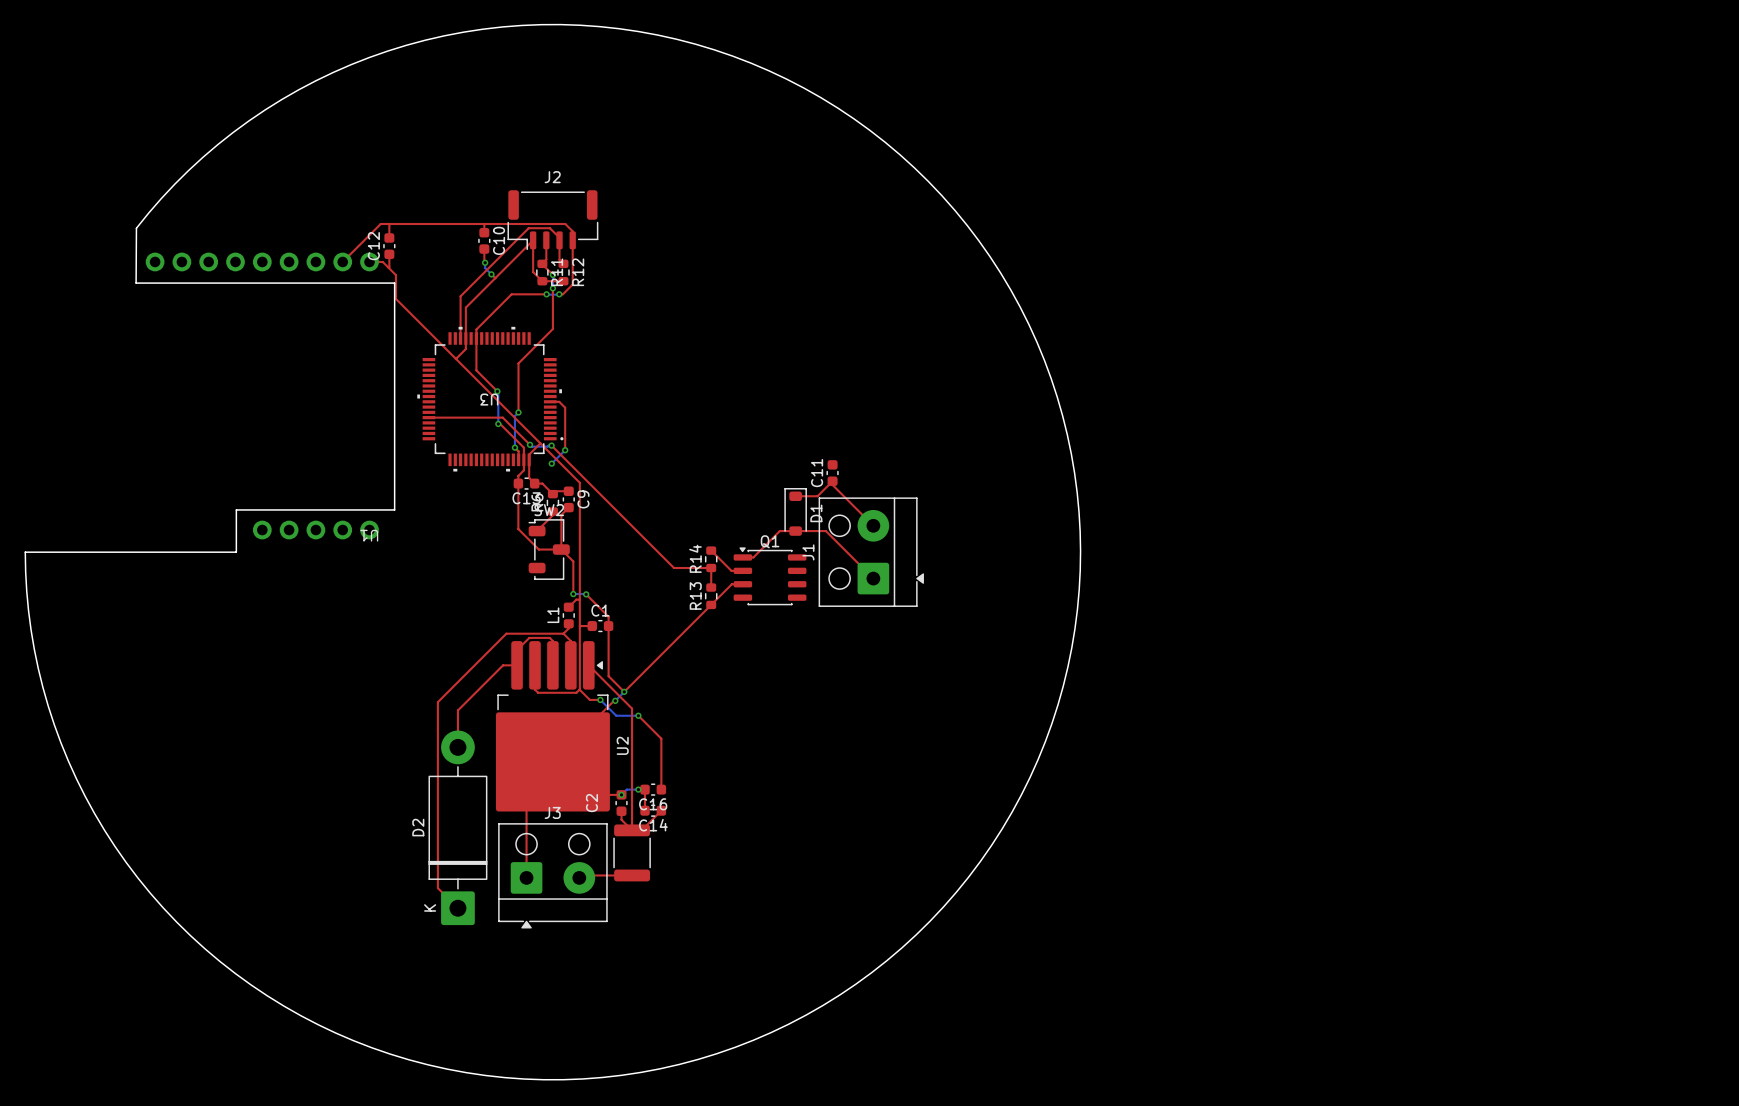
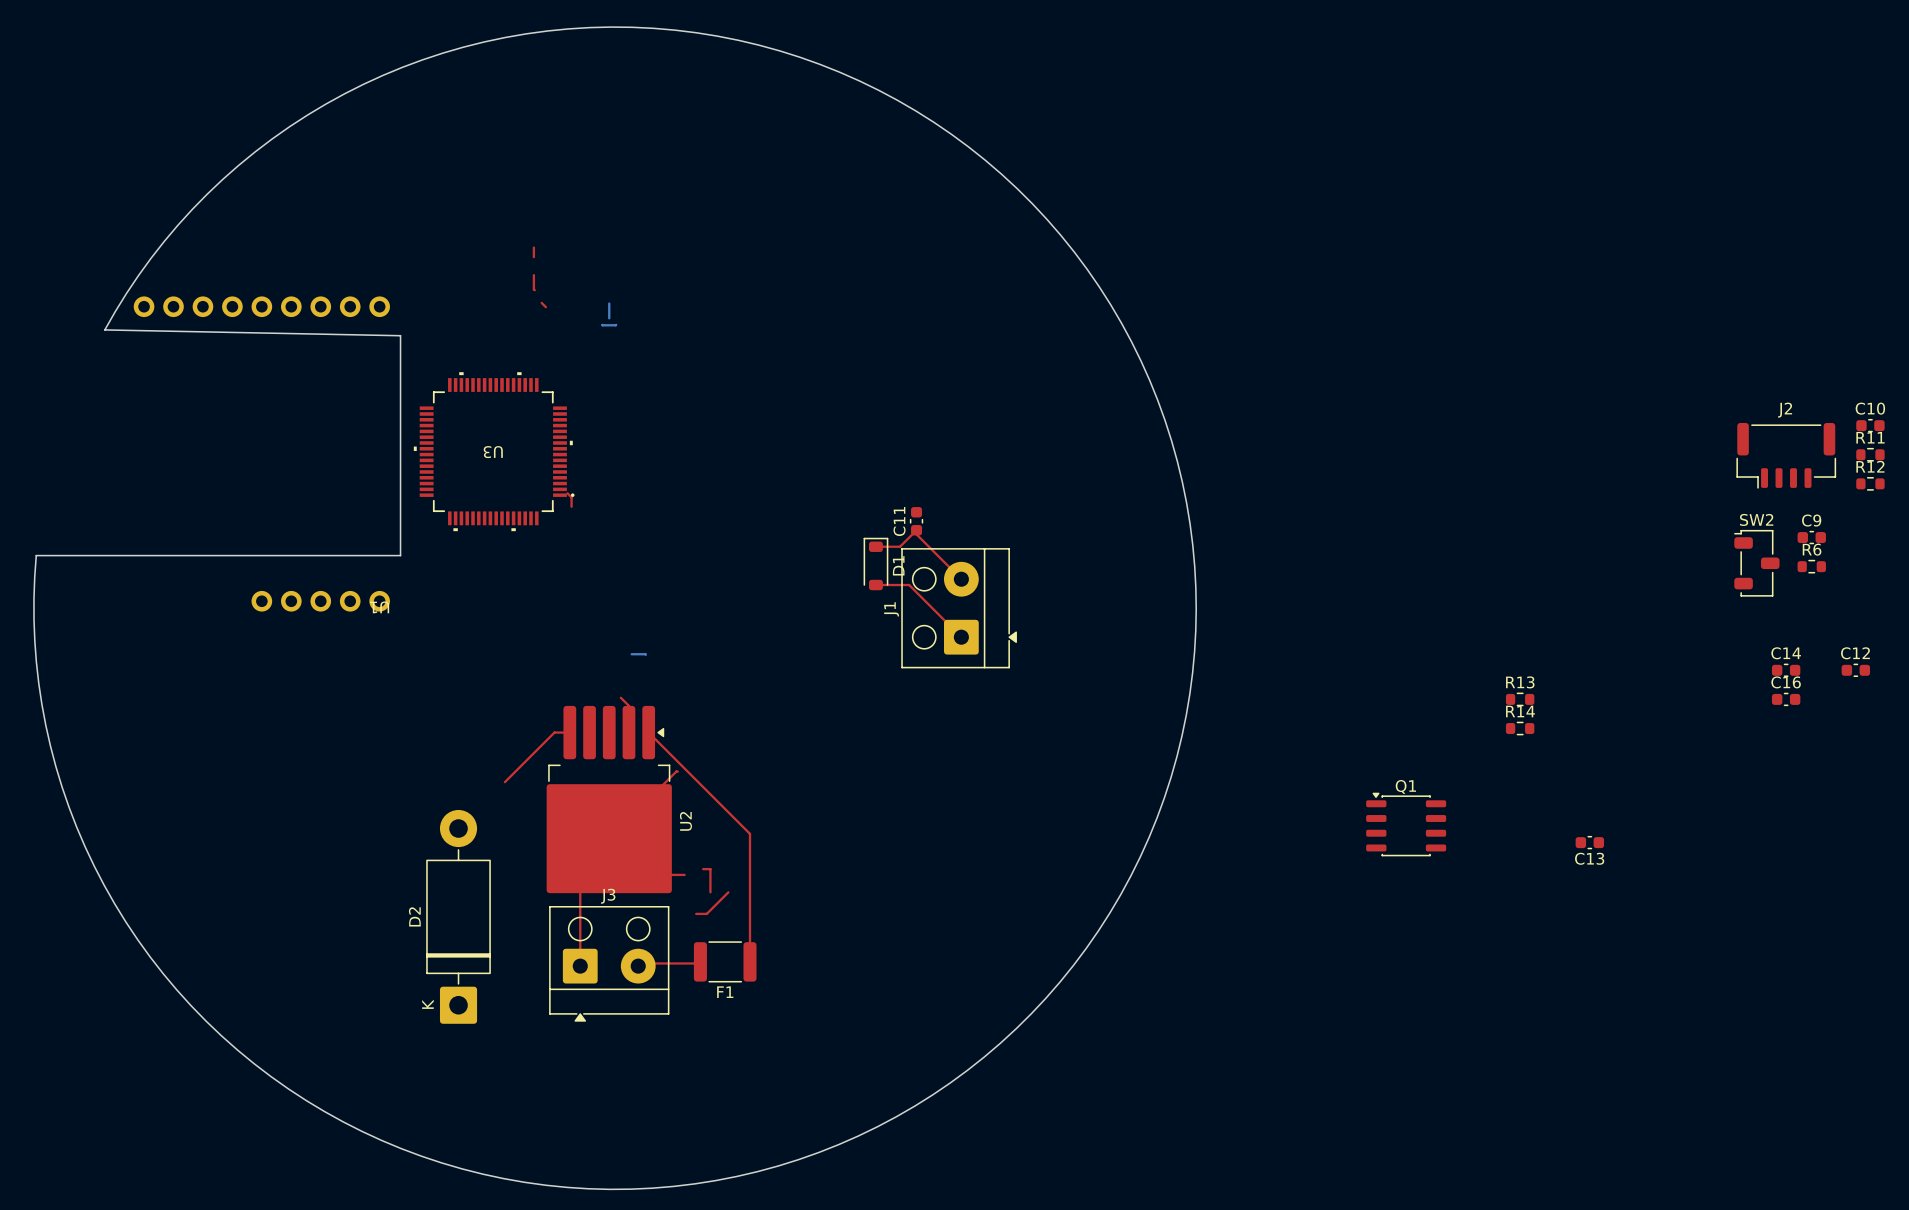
J2 position: (552, 220) -> (1786, 455)
top track: (389, 223) (389, 237) -> none
board edge: (136, 228) (136, 283) (394, 283) (394, 509) (236, 509) (236, 552) (25, 552) (28, 610) (38, 668) (54, 724) (76, 778) (104, 830) (150, 893) (190, 935) (235, 973) (267, 995) (318, 1024) (353, 1040) (409, 1059) (446, 1069) (504, 1077) (563, 1079) (621, 1075) (660, 1068) (716, 1053) (771, 1032) (806, 1015) (855, 984) (886, 960) (930, 921) (968, 877) (1002, 829) (1021, 795) (1037, 759) (1057, 704) (1071, 647) (1079, 589) (1080, 531) (1077, 492) (1067, 434) (1051, 378) (1028, 324) (1010, 289) (978, 240) (954, 210) (928, 181) (884, 142) (837, 107) (786, 79) (732, 56) (695, 44) (638, 31) (599, 26) (541, 24) (502, 26) (444, 35) (406, 45) (351, 64) (298, 89) (265, 109) (217, 144) (174, 184) (136, 228) -> (104, 329) (138, 275) (164, 241) (207, 194) (255, 151) (307, 115) (363, 84) (402, 67) (463, 47) (526, 33) (568, 28) (632, 27) (696, 32) (759, 45) (799, 57) (859, 80) (897, 100) (951, 134) (985, 160) (1032, 203) (1074, 252) (1110, 304) (1141, 361) (1165, 420) (1177, 461) (1190, 523) (1194, 566) (1196, 608) (1192, 672) (1182, 735) (1164, 797) (1140, 856) (1120, 894) (1086, 948) (1045, 998) (1000, 1043) (967, 1070) (914, 1106) (858, 1136) (798, 1159) (757, 1171) (694, 1183) (652, 1188) (609, 1189) (545, 1185) (482, 1174) (441, 1162) (381, 1140) (324, 1111) (271, 1076) (237, 1050) (206, 1021) (177, 990) (150, 956) (125, 921) (104, 885) (85, 846) (69, 807) (55, 766) (45, 725) (38, 683) (34, 640) (33, 598) (36, 555) (400, 555) (400, 335) (104, 329)
C10 rotation: 0° (484, 240) -> 90° clockwise (1870, 425)
C10 position: (484, 240) -> (1870, 425)
C10 name position: C10 (499, 240) -> C10 (1870, 408)
top track: (546, 240) (546, 259) (542, 264) (552, 274) -> none
C12 rotation: 0° (389, 246) -> 90° clockwise (1855, 670)
C12 position: (389, 246) -> (1855, 670)
top track: (389, 254) (388, 267) -> none
top track: (342, 261) (380, 223) (565, 223) (572, 231) (572, 284) (562, 294) (559, 294) -> none
top track: (369, 261) (382, 261) (395, 275) (395, 298) (579, 482) (579, 689) (576, 692) (538, 692) (534, 689) (534, 665) -> none
bottom track: (485, 262) (485, 268) (491, 274) -> none
via: (485, 262) -> none
top track: (563, 263) (559, 259) (559, 237) (549, 228) (528, 228) (460, 296) (460, 338) -> none
R11 rotation: 0° (542, 272) -> 90° clockwise (1870, 454)
R11 position: (542, 272) -> (1870, 454)
R11 name position: R11 (557, 272) -> R11 (1870, 437)
R12 rotation: 0° (563, 272) -> 90° clockwise (1870, 483)
R12 position: (563, 272) -> (1870, 483)
R12 name position: R12 (578, 272) -> R12 (1870, 466)
via: (491, 274) -> none
via: (552, 274) -> none
top track: (563, 281) (542, 281) (533, 272) (533, 240) (465, 307) (465, 349) (455, 358) -> none
top track: (552, 288) (552, 328) (518, 363) (518, 412) -> none
via: (552, 288) -> none
top track: (546, 294) (511, 294) (476, 329) (476, 370) (497, 391) -> none
via: (546, 294) -> none
via: (559, 294) -> none
bottom track: (497, 391) (498, 423) -> none
via: (497, 391) -> none
U1 position: (262, 396) -> (261, 453)
U3 position: (490, 399) -> (494, 451)
top track: (550, 401) (559, 401) (565, 407) (565, 450) -> none
bottom track: (518, 412) (514, 416) (514, 447) -> none
via: (518, 412) -> none
top track: (428, 417) (502, 417) (529, 444) -> none
top track: (498, 423) (523, 447) (523, 470) (518, 475) (518, 529) (538, 549) (561, 549) -> none
via: (498, 423) -> none
top track: (540, 443) (529, 454) (529, 478) (534, 483) (542, 483) (552, 494) (555, 491) (568, 491) -> none
bottom track: (529, 444) (531, 446) (551, 445) -> none
via: (529, 444) -> none
top track: (551, 445) (674, 568) (711, 568) (711, 587) -> none
via: (551, 445) -> none
via: (514, 447) -> none
bottom track: (565, 450) (551, 463) -> none
via: (565, 450) -> none
via: (551, 463) -> none
C13 position: (526, 483) -> (1589, 842)
C9 rotation: 0° (568, 499) -> 90° clockwise (1811, 537)
C9 position: (568, 499) -> (1811, 537)
C9 name position: C9 (583, 499) -> C9 (1811, 520)
R6 rotation: 0° (552, 502) -> 90° clockwise (1811, 566)
R6 position: (552, 502) -> (1811, 566)
top track: (568, 507) (561, 514) (561, 549) -> none
top track: (552, 511) (552, 515) (537, 531) -> none
top track: (795, 531) (779, 531) (753, 557) (742, 557) -> none
SW2 position: (549, 549) -> (1756, 563)
top track: (561, 549) (573, 561) (573, 594) -> none
top track: (711, 550) (731, 570) (742, 570) -> none
R14 rotation: 0° (711, 559) -> 90° clockwise (1520, 728)
R14 position: (711, 559) -> (1520, 728)
Q1 position: (770, 576) -> (1406, 824)
top track: (742, 584) (731, 584) (624, 691) (608, 676) (608, 616) (586, 594) -> none
via: (573, 594) -> none
via: (586, 594) -> none
R13 rotation: 0° (711, 596) -> 90° clockwise (1520, 699)
R13 position: (711, 596) -> (1520, 699)
top track: (579, 599) (576, 599) (568, 607) -> none
L1: (568, 615) -> none
top track: (568, 623) (568, 628) (563, 633) (506, 633) (437, 702) (437, 888) (457, 908) -> none
top track: (579, 626) (592, 626) -> none
C1: (600, 626) -> none
top track: (517, 665) (517, 650) (529, 637) (549, 637) (552, 641) (552, 665) -> none
top track: (579, 689) (589, 699) (600, 699) -> none
bottom track: (624, 691) (615, 700) -> none
via: (624, 691) -> none
bottom track: (600, 699) (616, 715) (638, 715) -> none
via: (600, 699) -> none
via: (615, 700) -> none
top track: (632, 708) (632, 830) (621, 819) (621, 811) -> (696, 780) (750, 833) (750, 961)
top track: (457, 710) (457, 747) -> none
top track: (638, 715) (661, 738) (661, 789) -> none
via: (638, 715) -> none
bottom track: (638, 789) (626, 789) (621, 794) -> none
via: (638, 789) -> none
C16 position: (653, 789) -> (1786, 699)
via: (621, 794) -> none
C2: (621, 803) -> none
C16 name position: C16 (653, 804) -> C16 (1786, 682)
C14 position: (653, 810) -> (1786, 670)
C14 name position: C14 (653, 825) -> C14 (1786, 653)
D2 position: (457, 827) -> (458, 916)
part: (632, 852) -> none
F1: none -> (725, 961)

